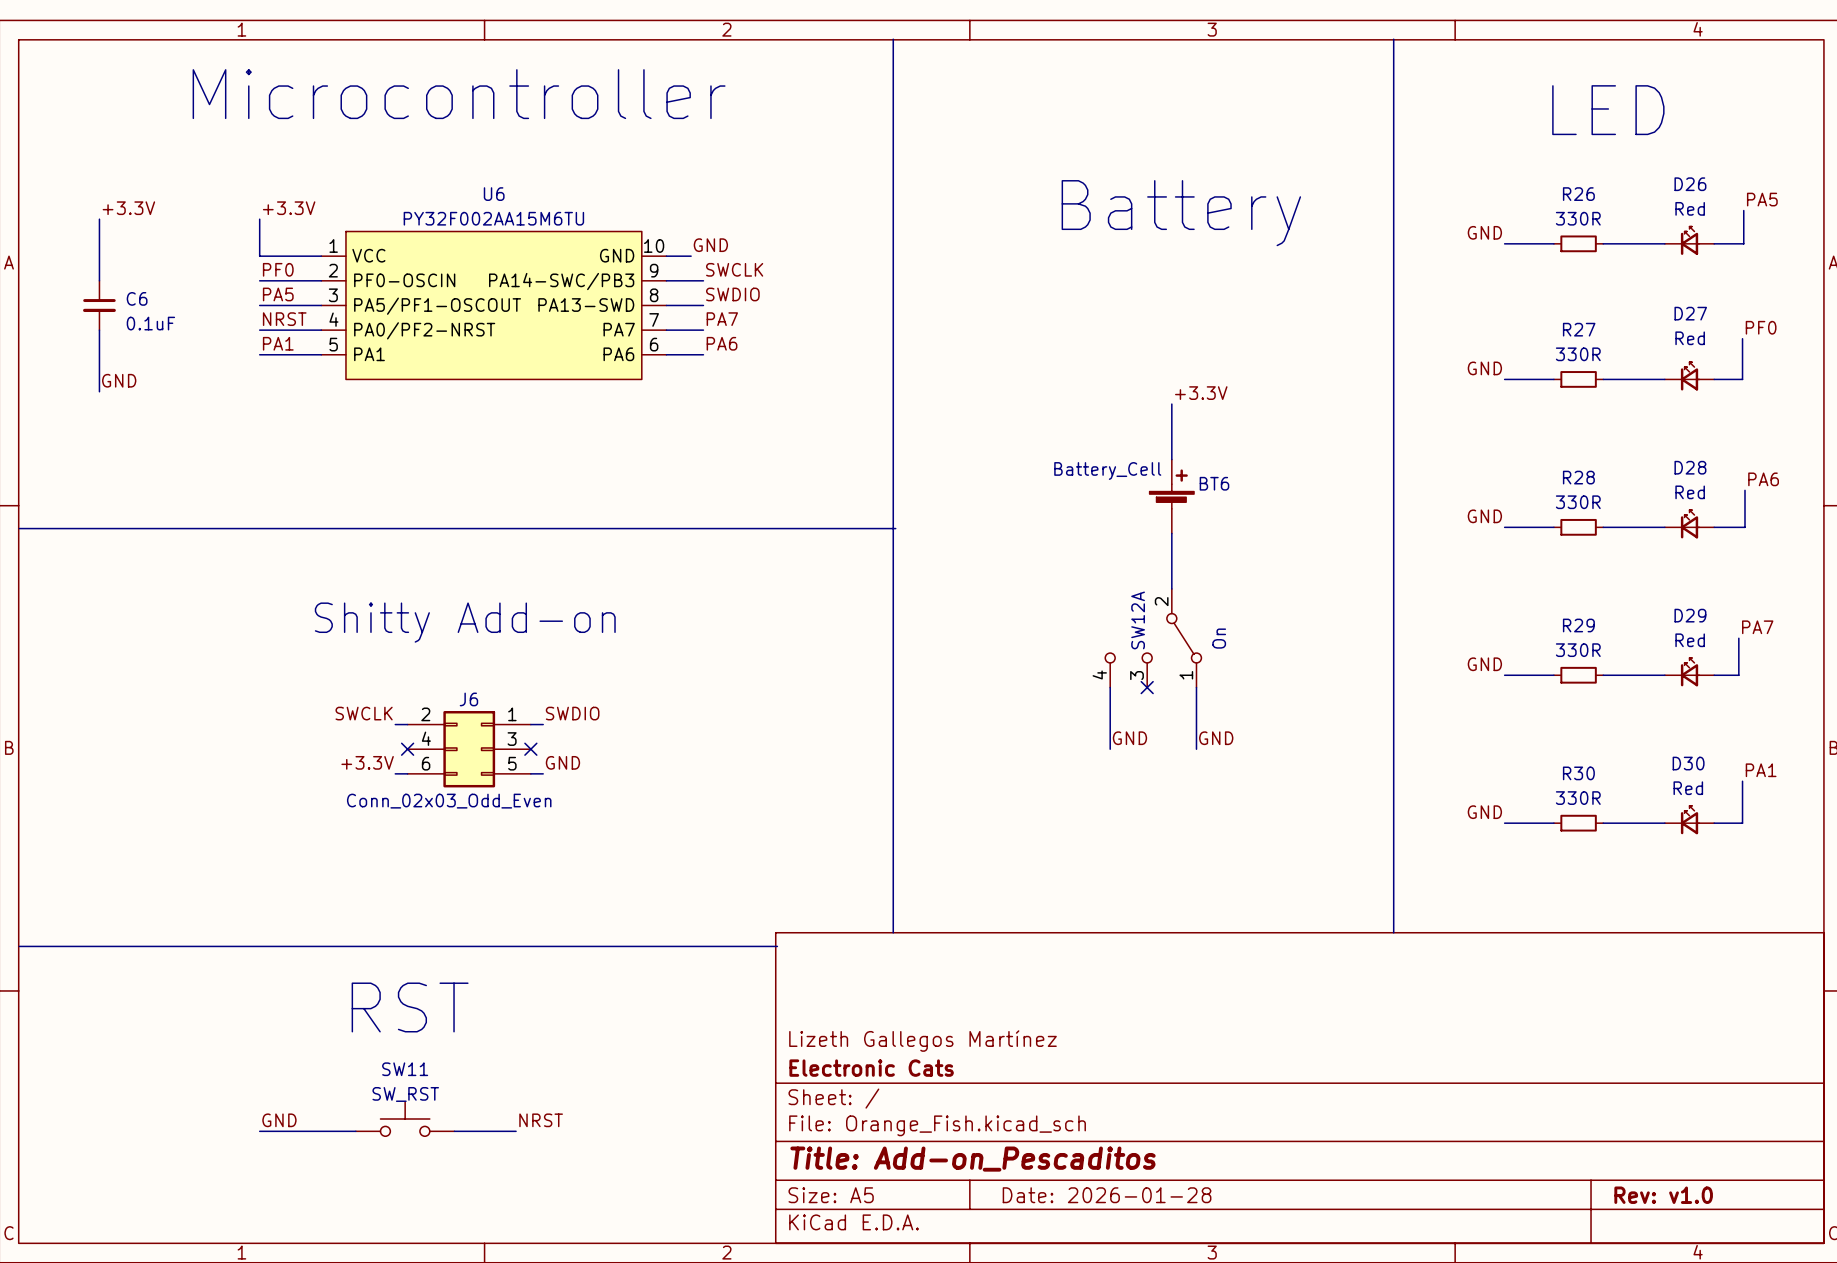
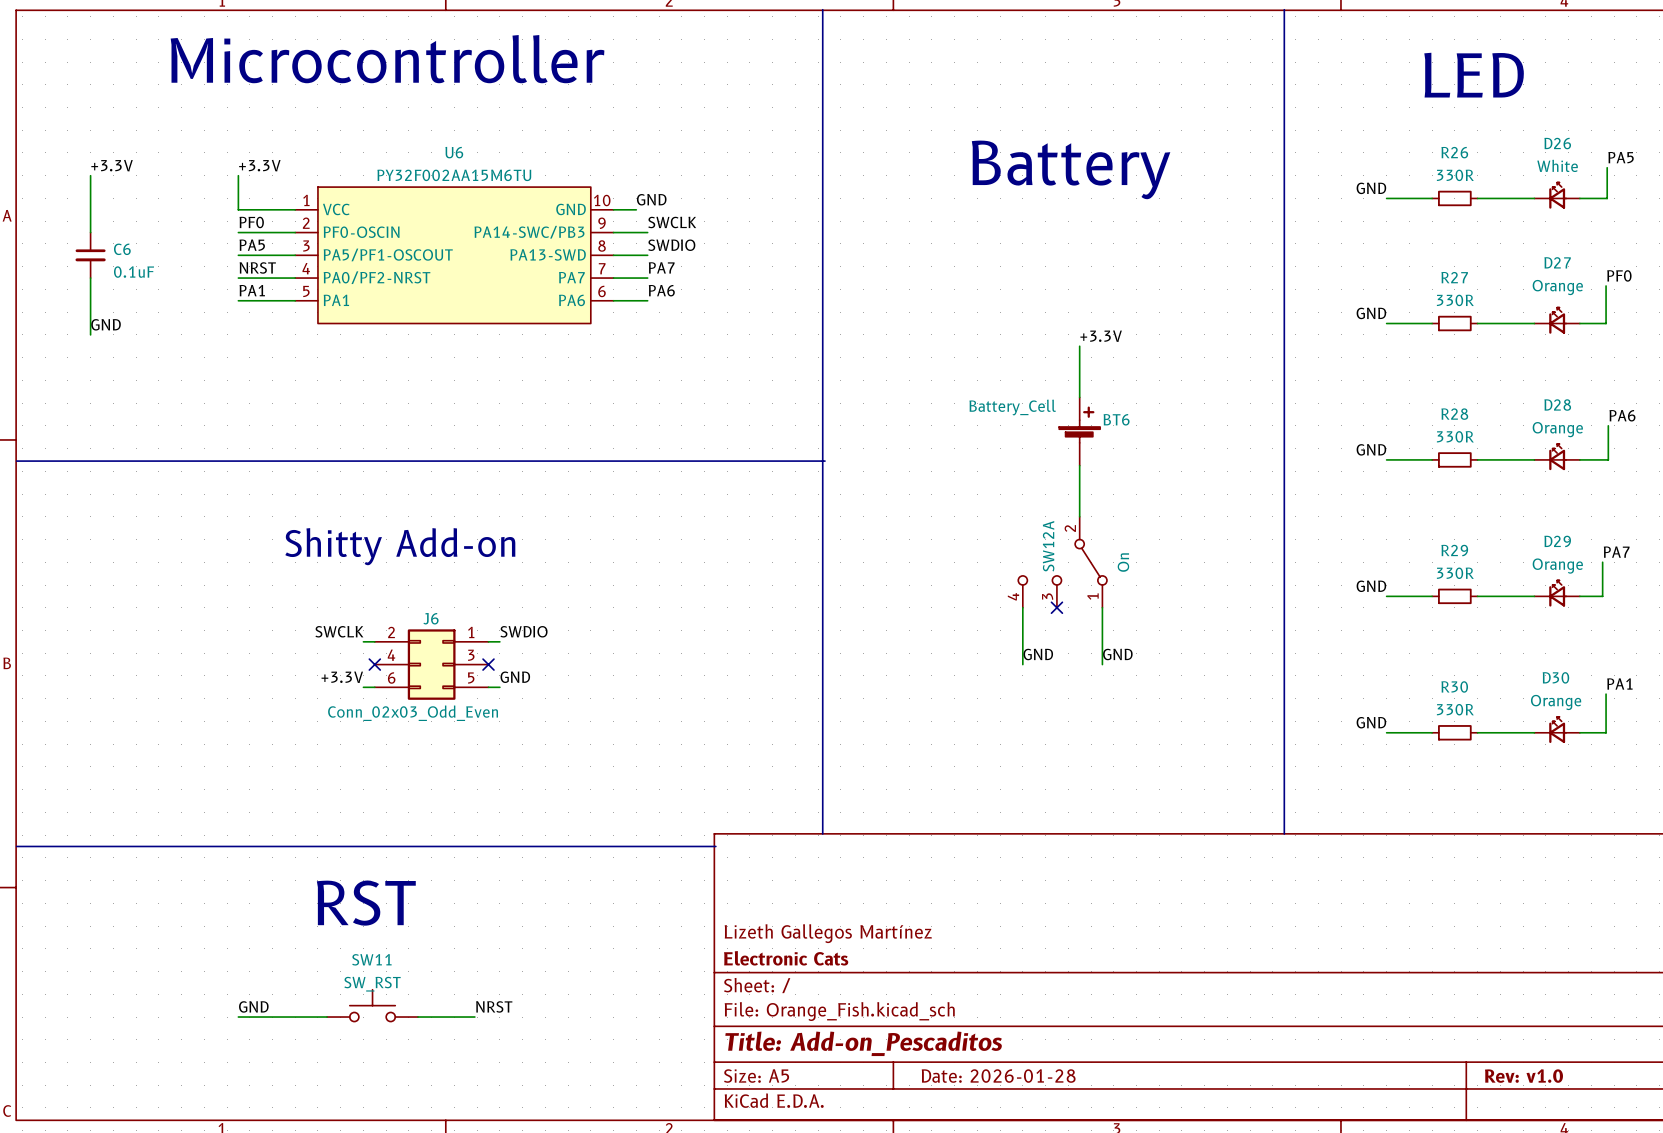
D26 value: Red (1690, 208) -> White (1557, 165)
D27 value: Red (1690, 338) -> Orange (1557, 287)
D28 value: Red (1690, 492) -> Orange (1557, 429)
D29 value: Red (1690, 640) -> Orange (1557, 566)
D30 value: Red (1688, 788) -> Orange (1556, 702)

